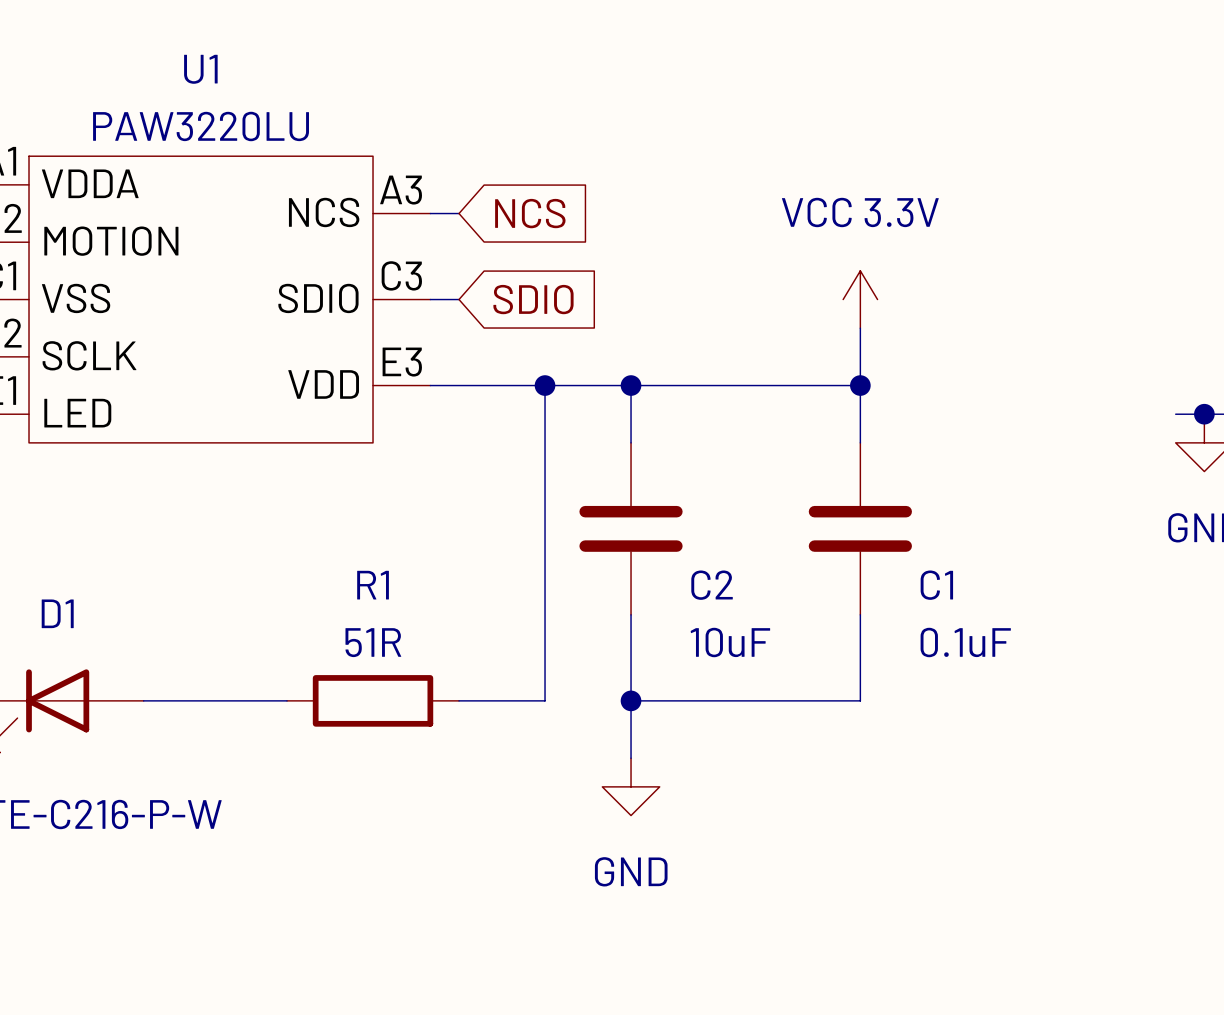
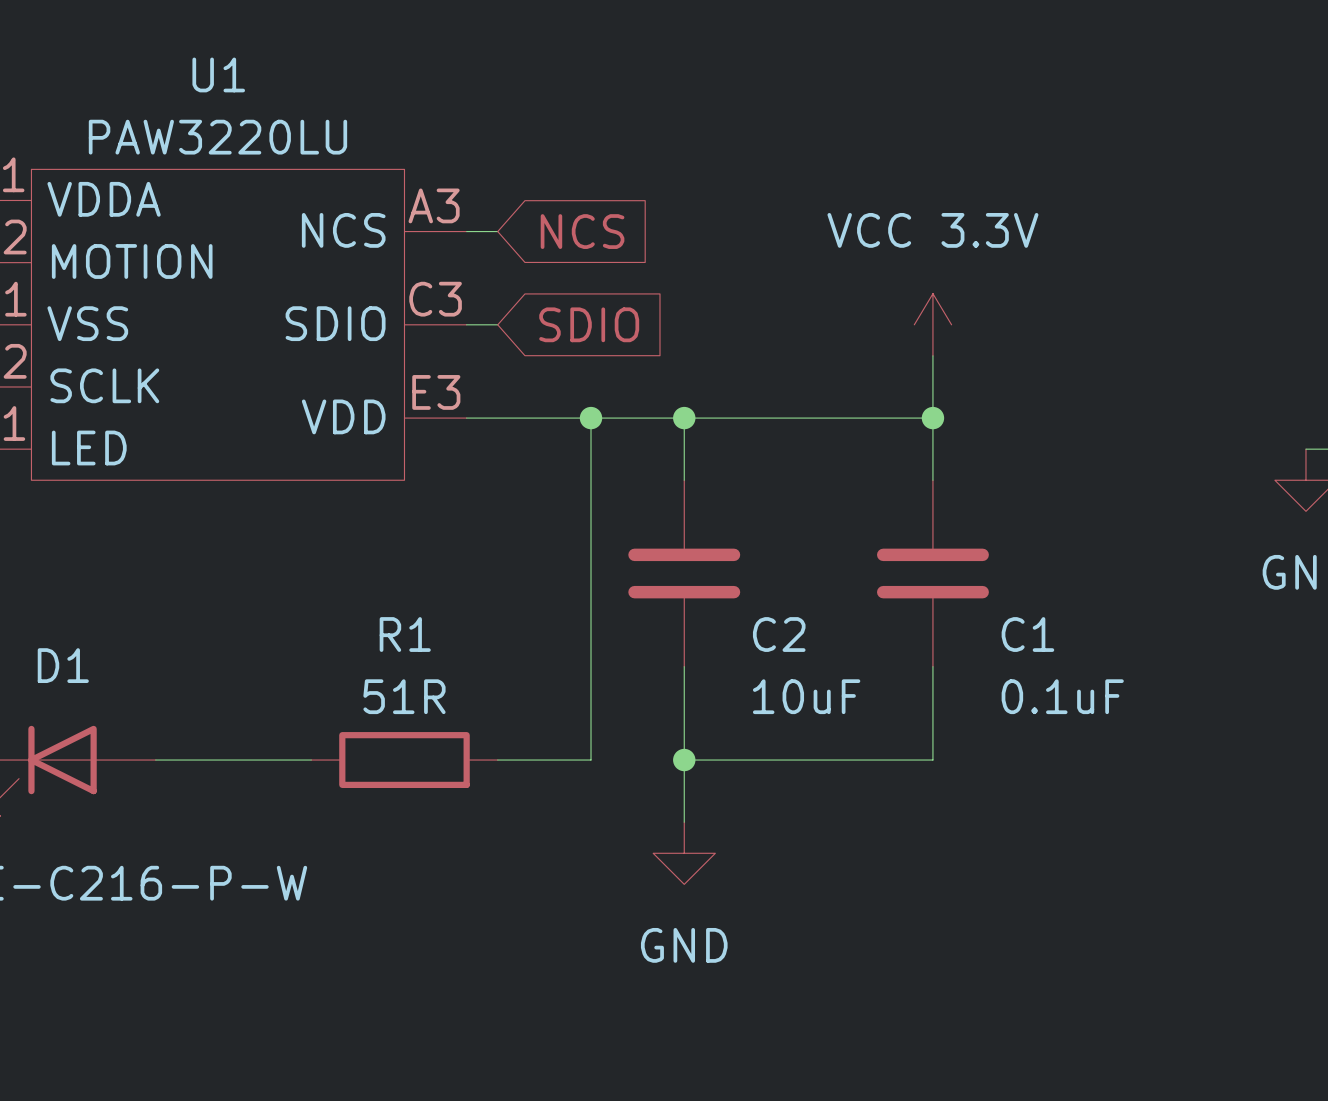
wire: (1175, 414) (1204, 414) -> none
junction: (1204, 414) -> none

